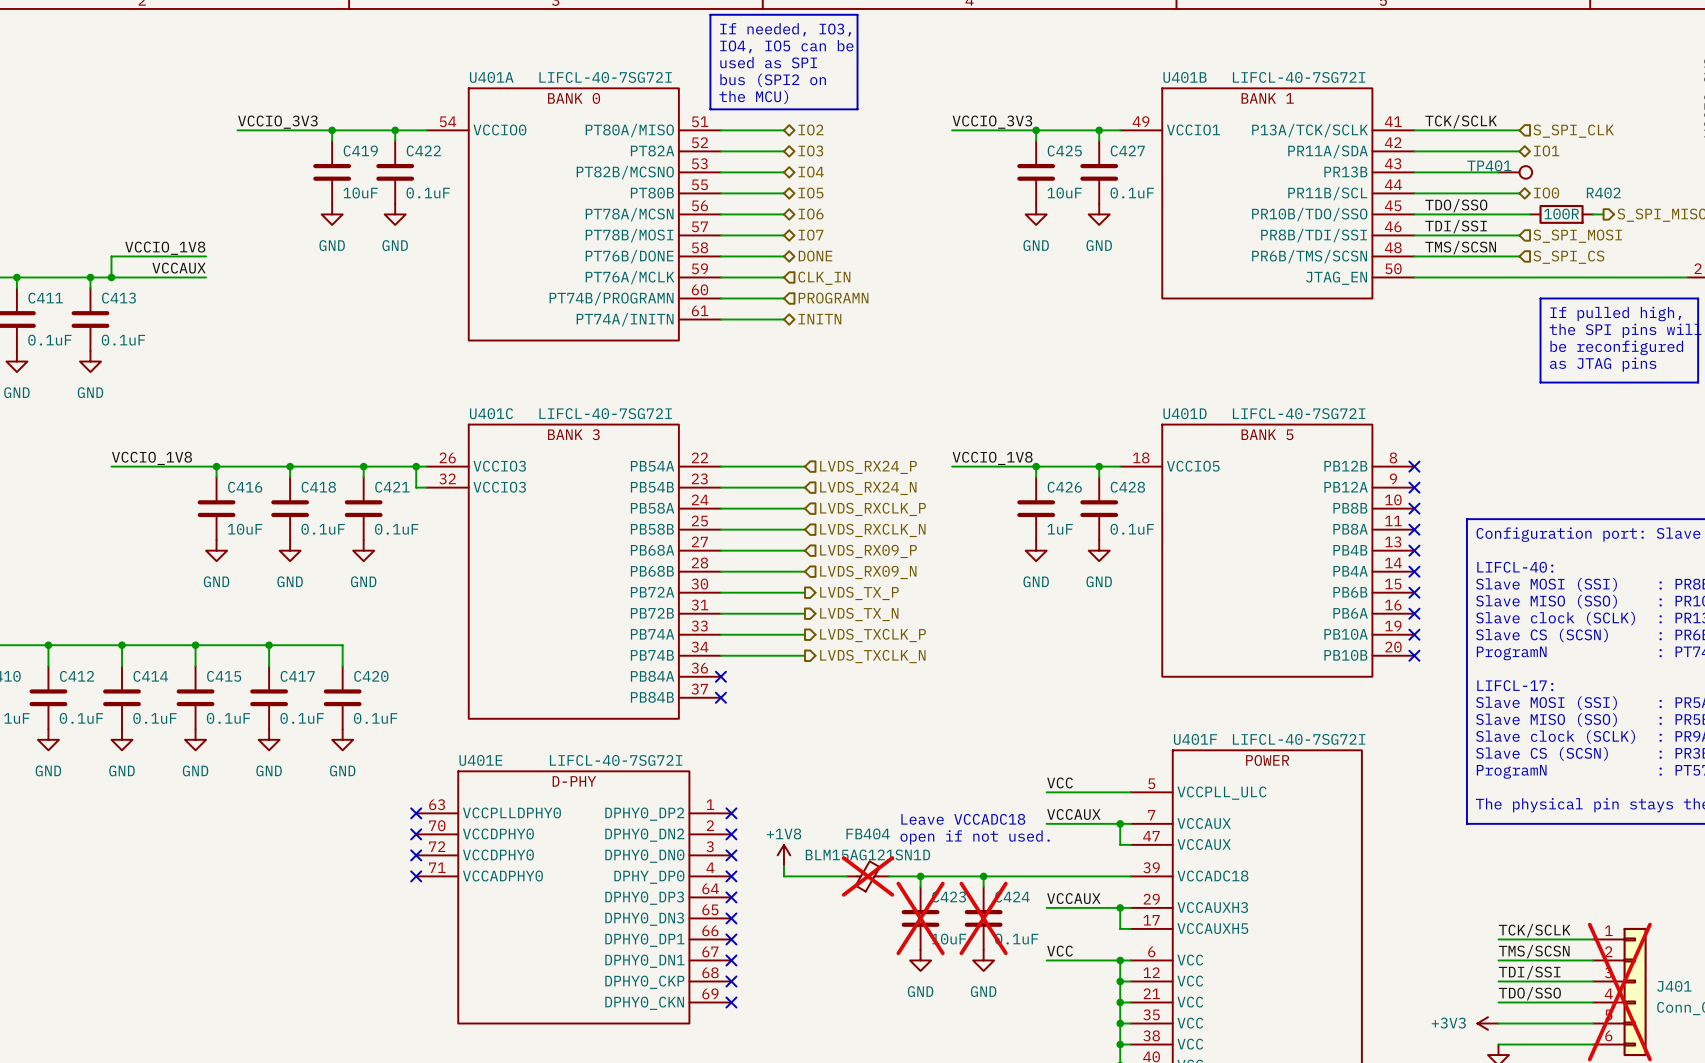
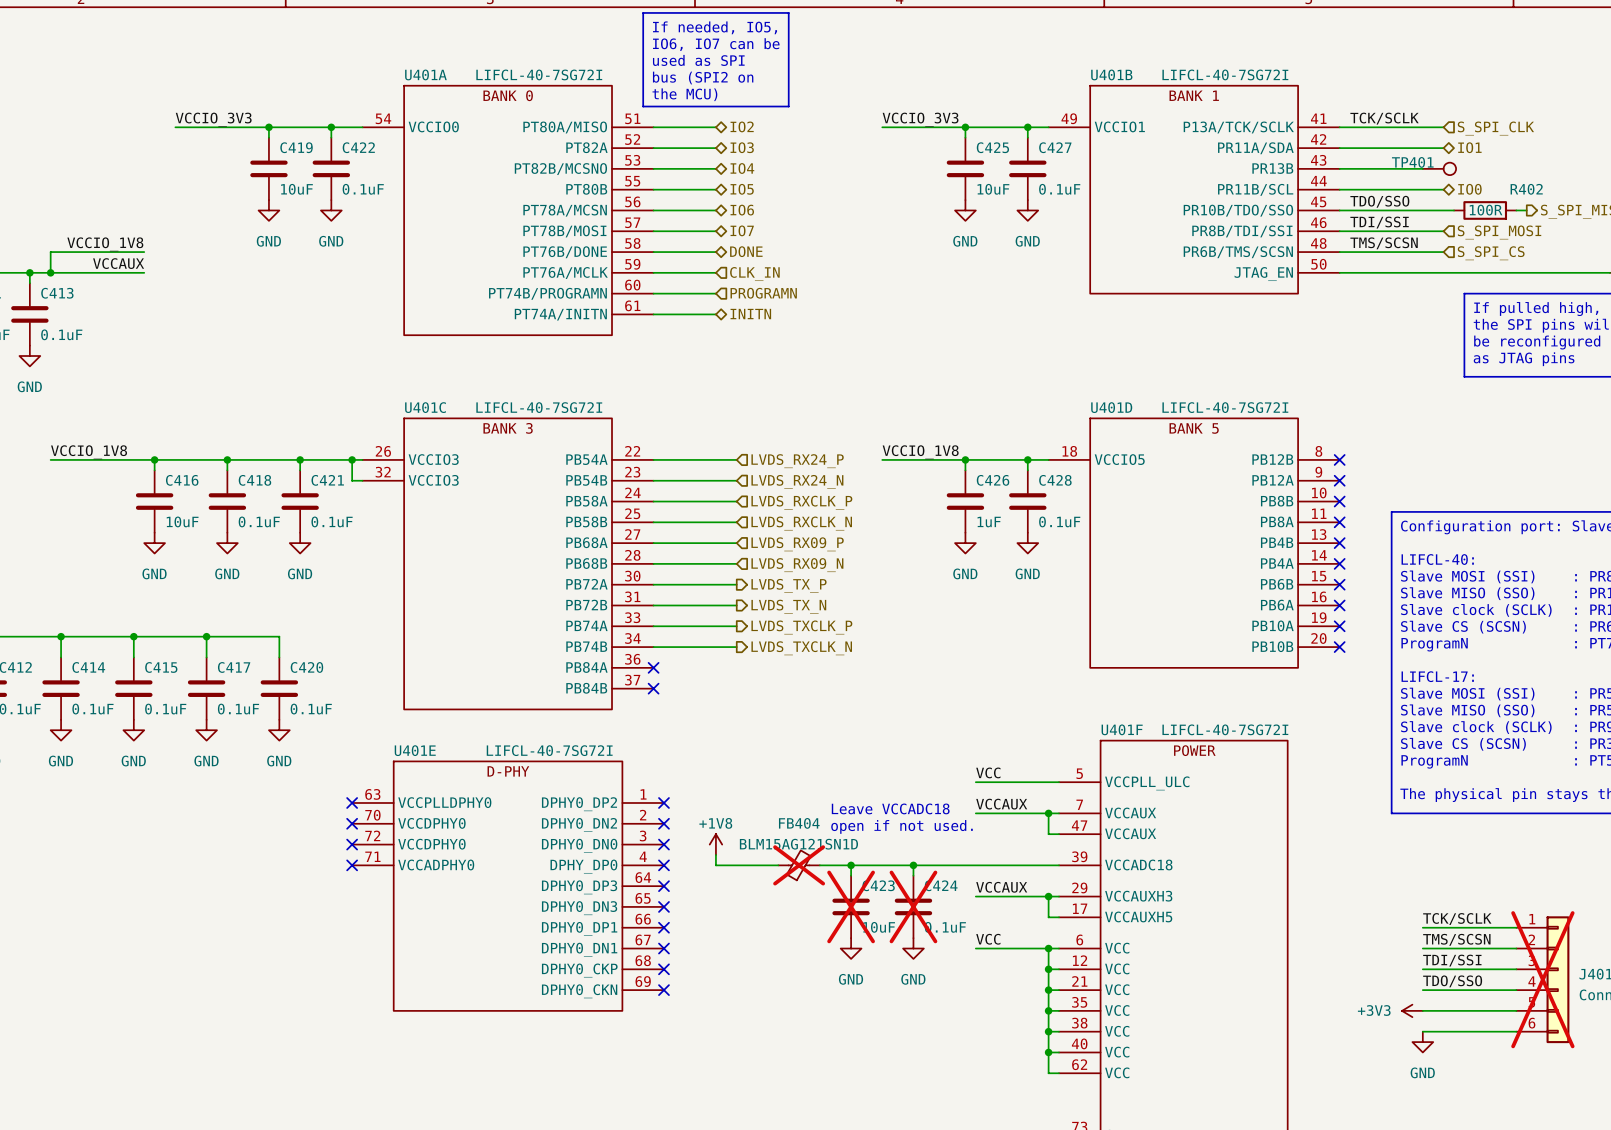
text: If needed, IO3, (785, 29) -> If needed, IO5, (715, 27)
text: IO4, IO5 can be (786, 46) -> IO6, IO7 can be (716, 44)

